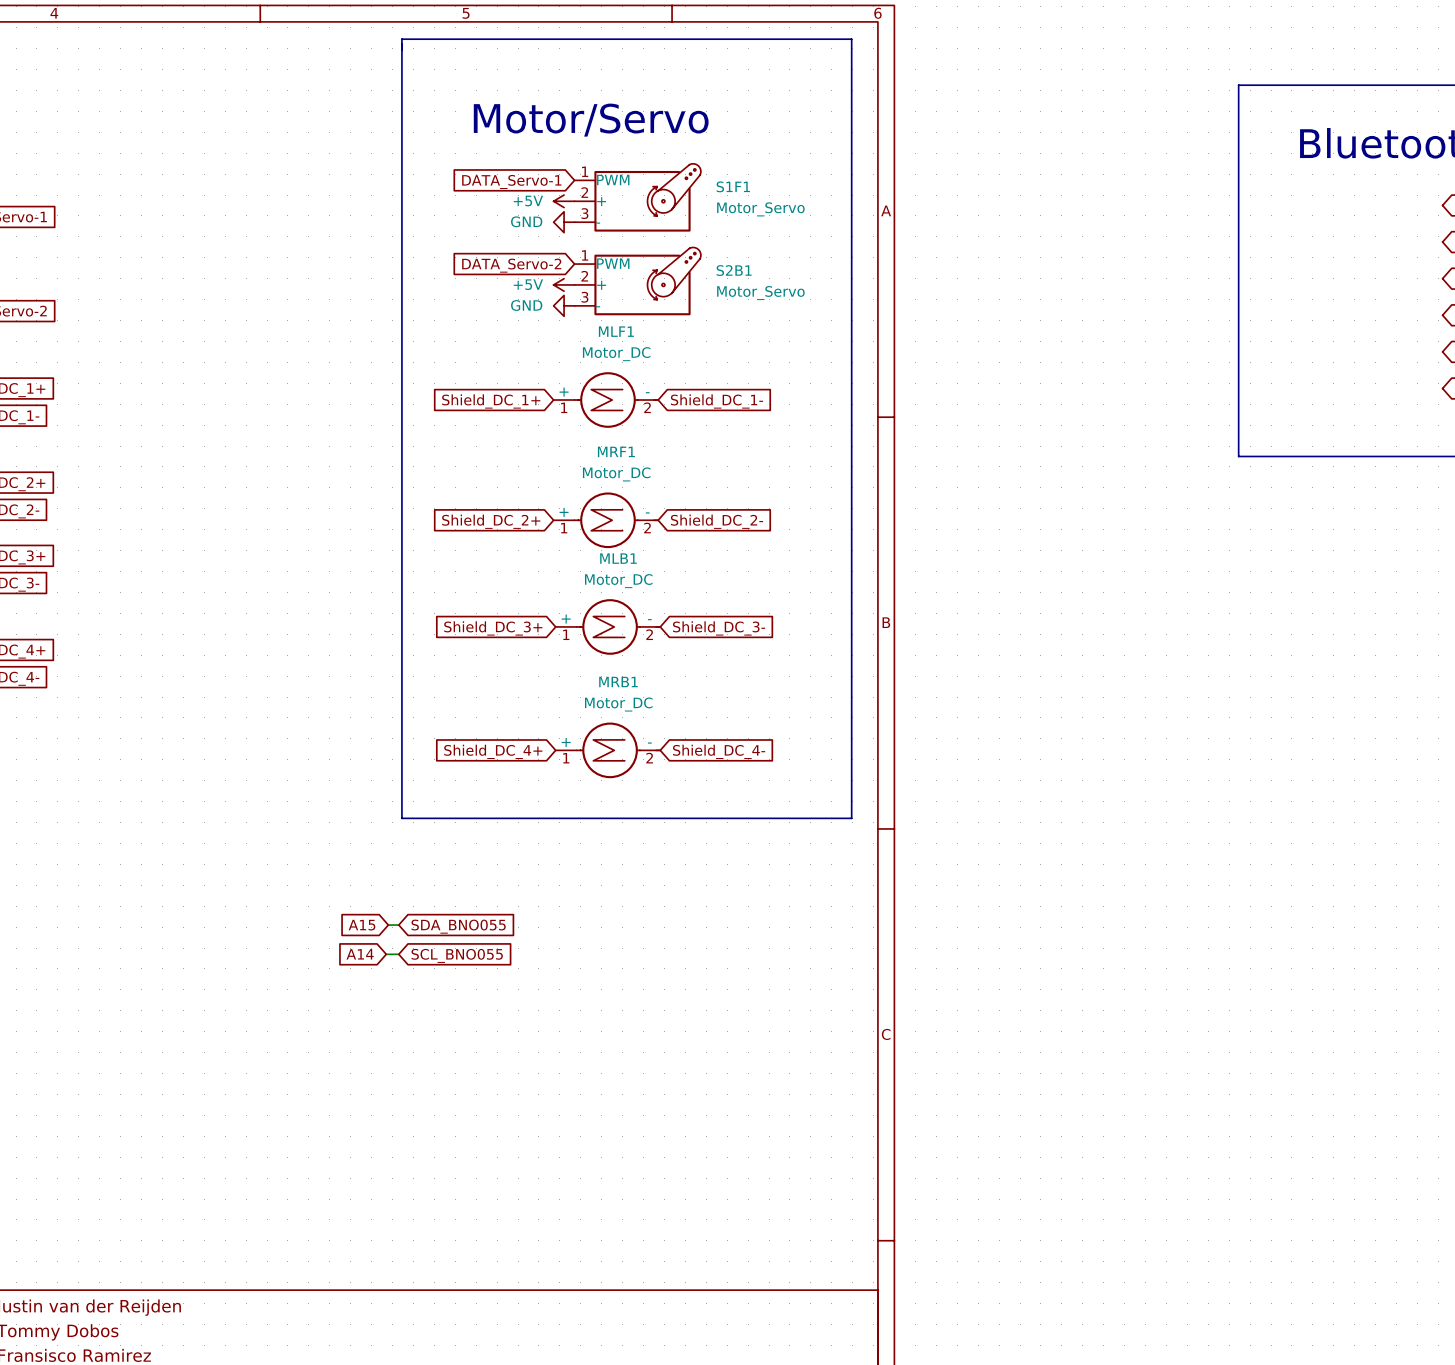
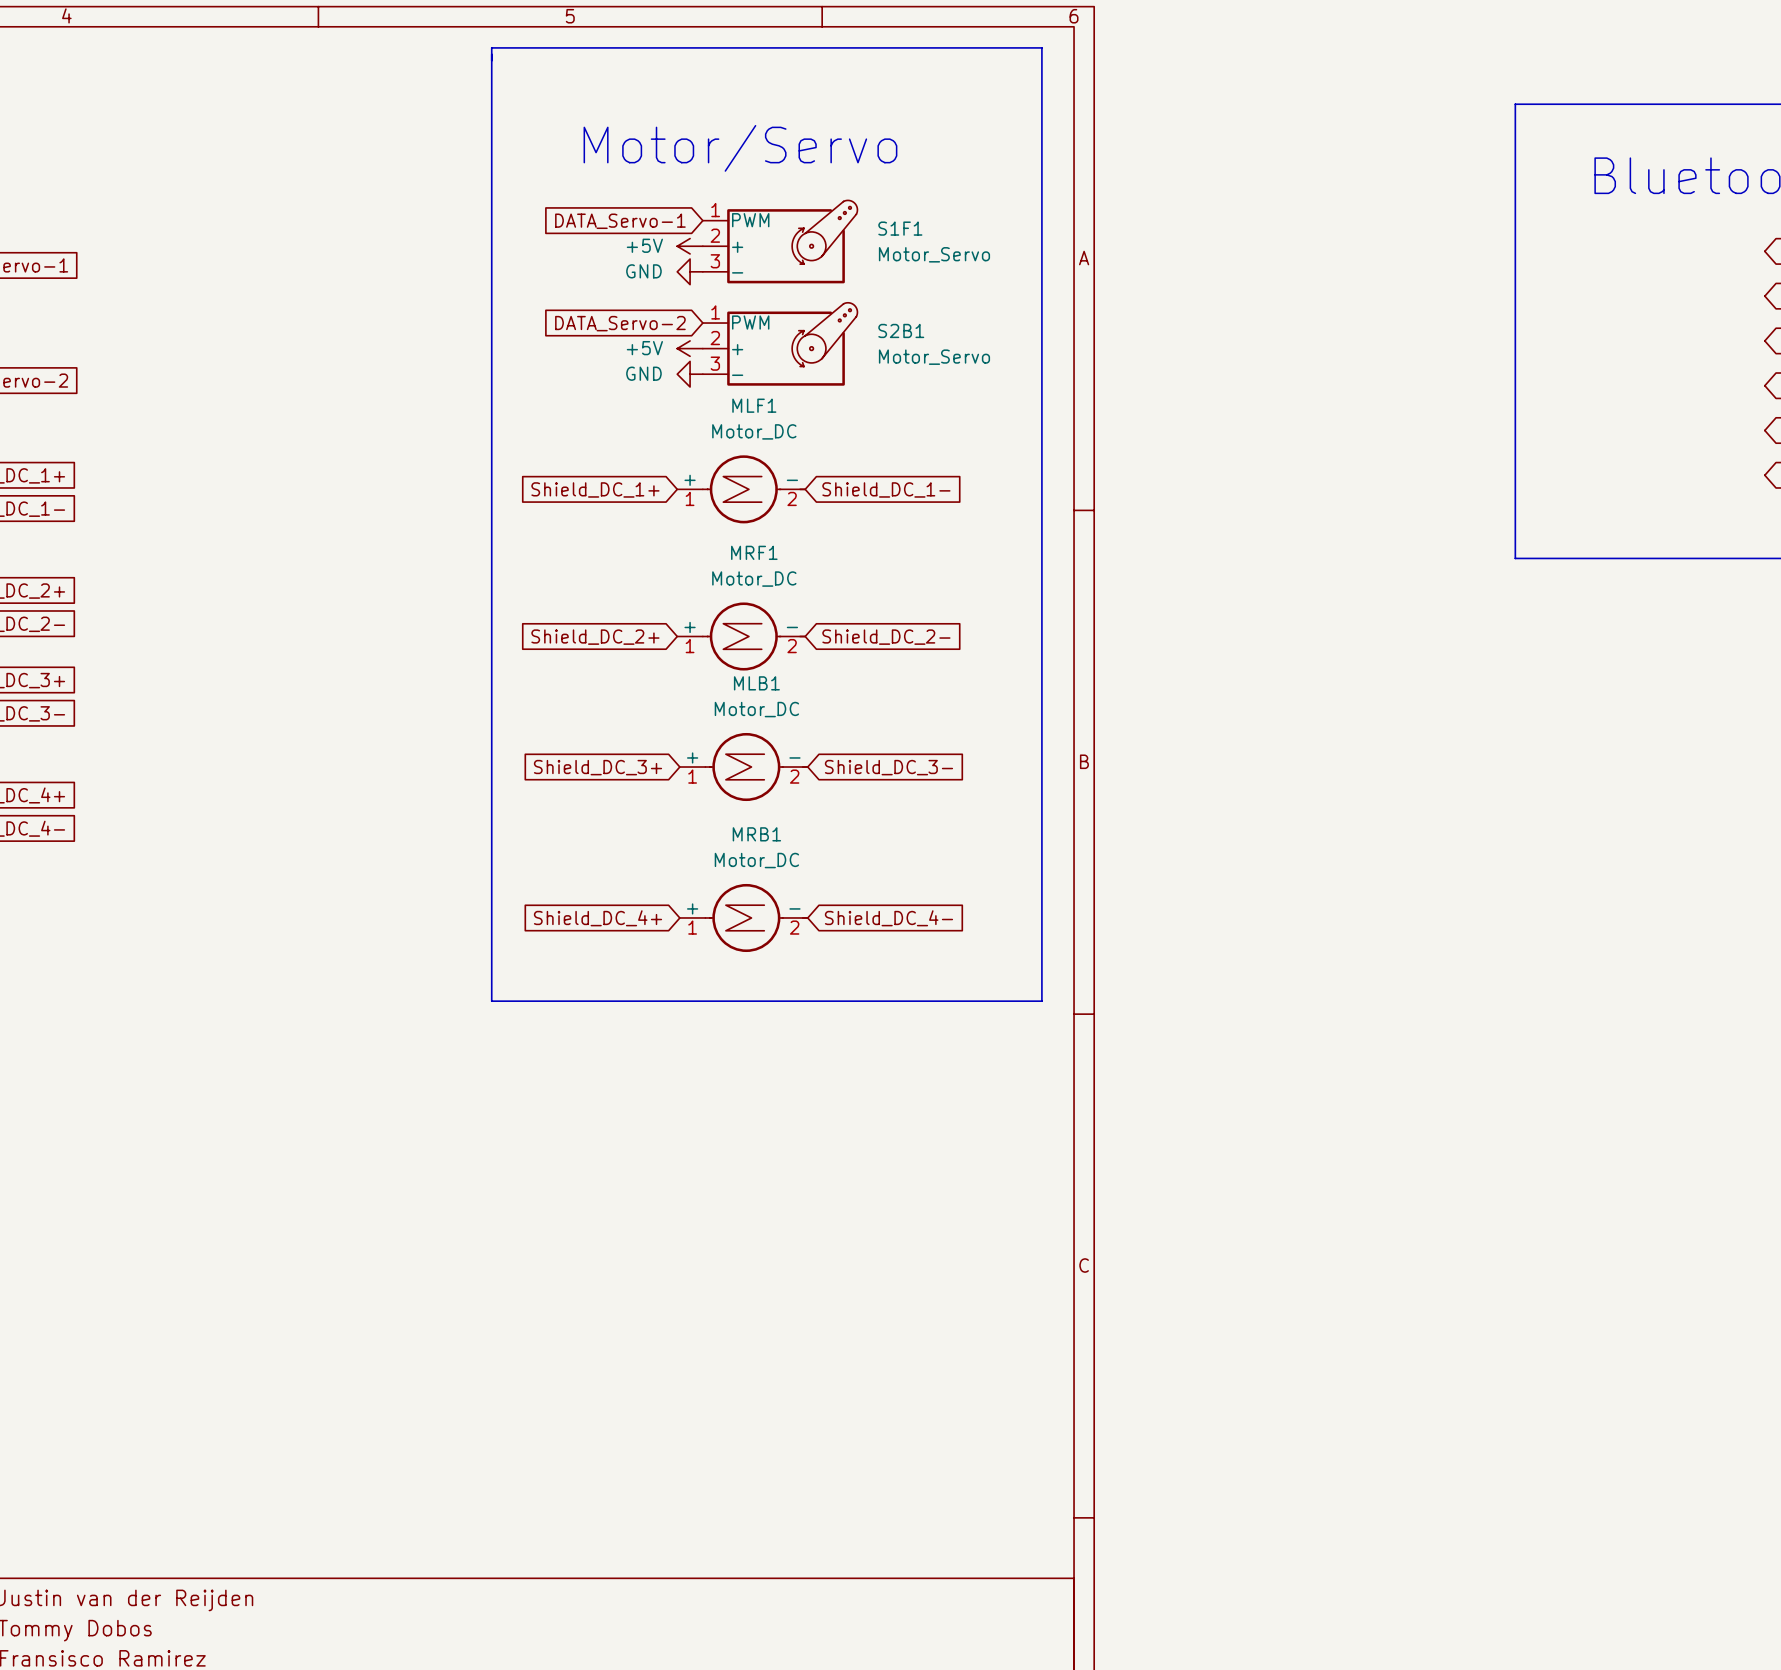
global label: A15 (361, 925) -> none
wire: (388, 925) (398, 925) -> none
global label: SDA_BNO055 (458, 926) -> none
global label: A14 (360, 954) -> none
wire: (386, 954) (398, 954) -> none
global label: SCL_BNO055 (457, 955) -> none

